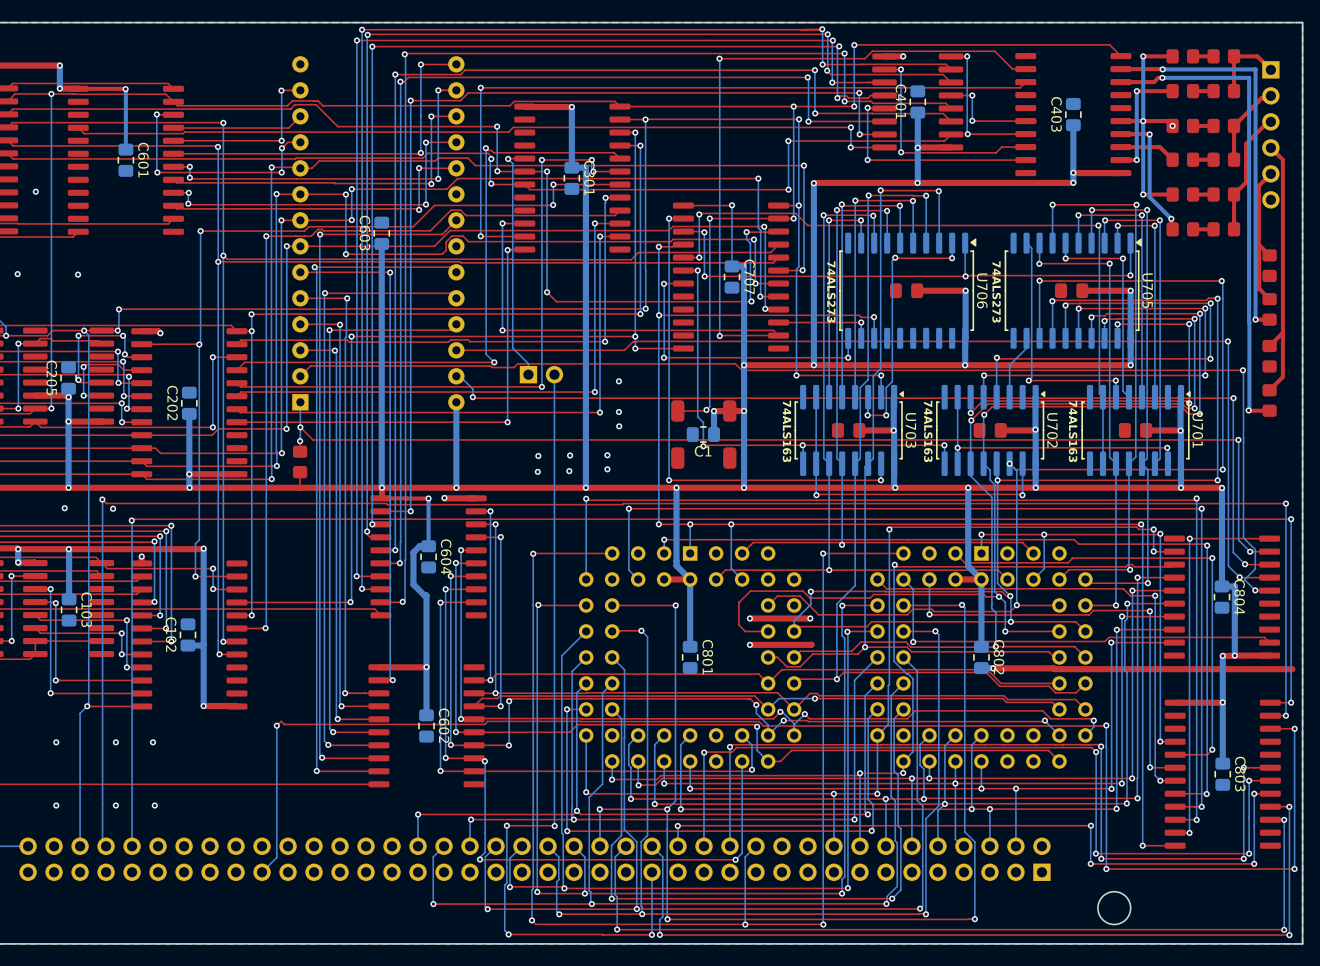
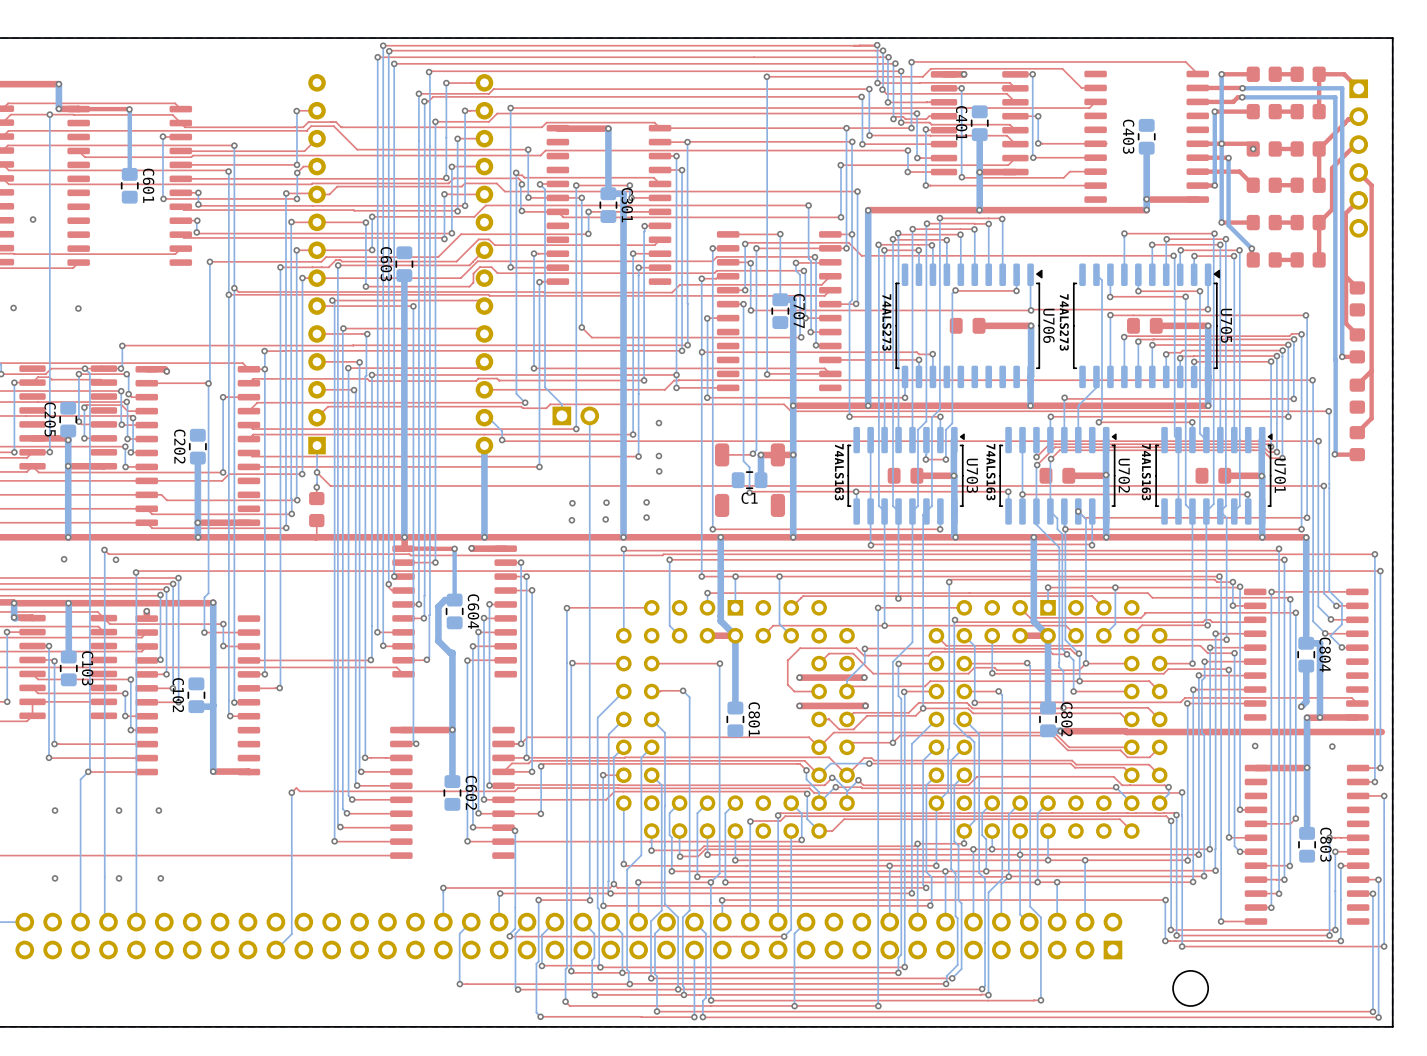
bottom track: none -> (1306, 666) (1306, 701) (1301, 706)
via: none -> (865, 705)
via: none -> (1301, 706)
via: none -> (1255, 746)
via: none -> (1332, 746)

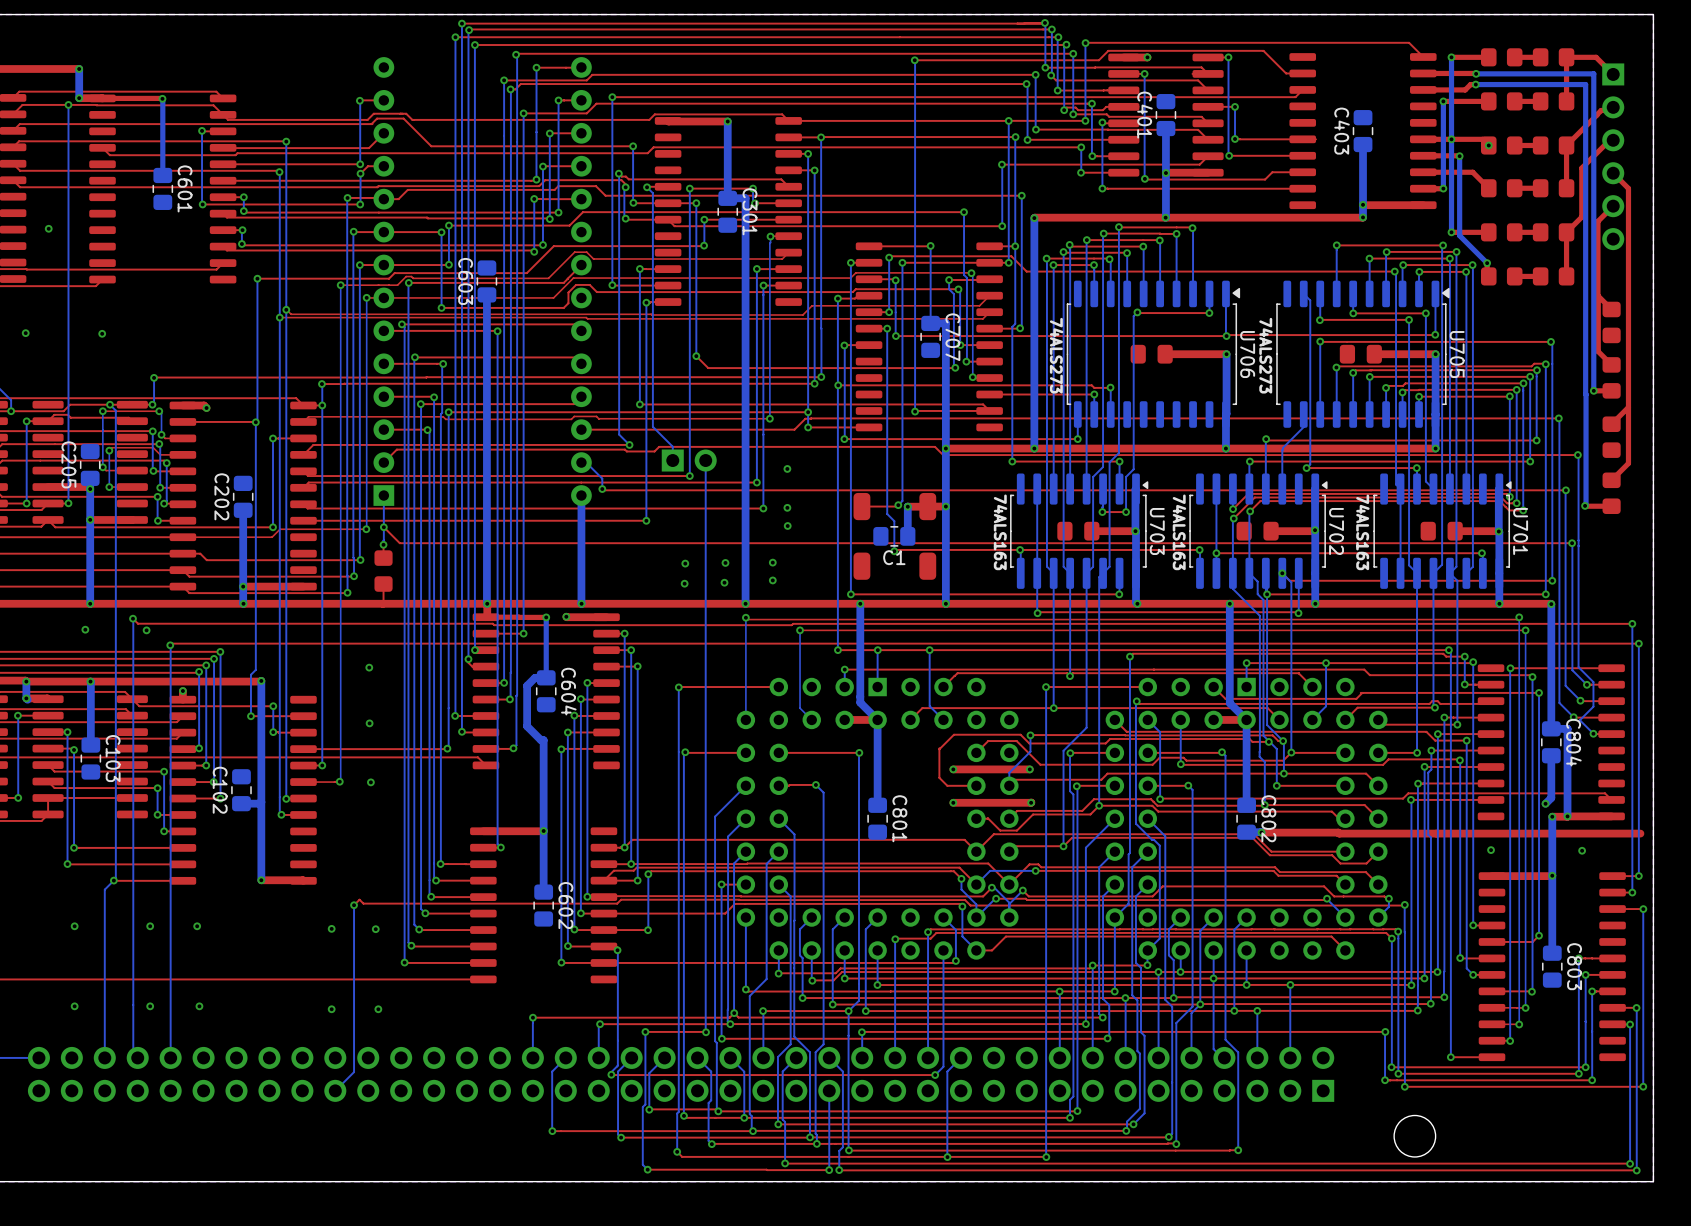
via: none -> (369, 667)
via: none -> (369, 723)
via: none -> (370, 782)
via: none -> (331, 928)
via: none -> (375, 929)
via: none -> (331, 1009)
via: none -> (378, 1009)

